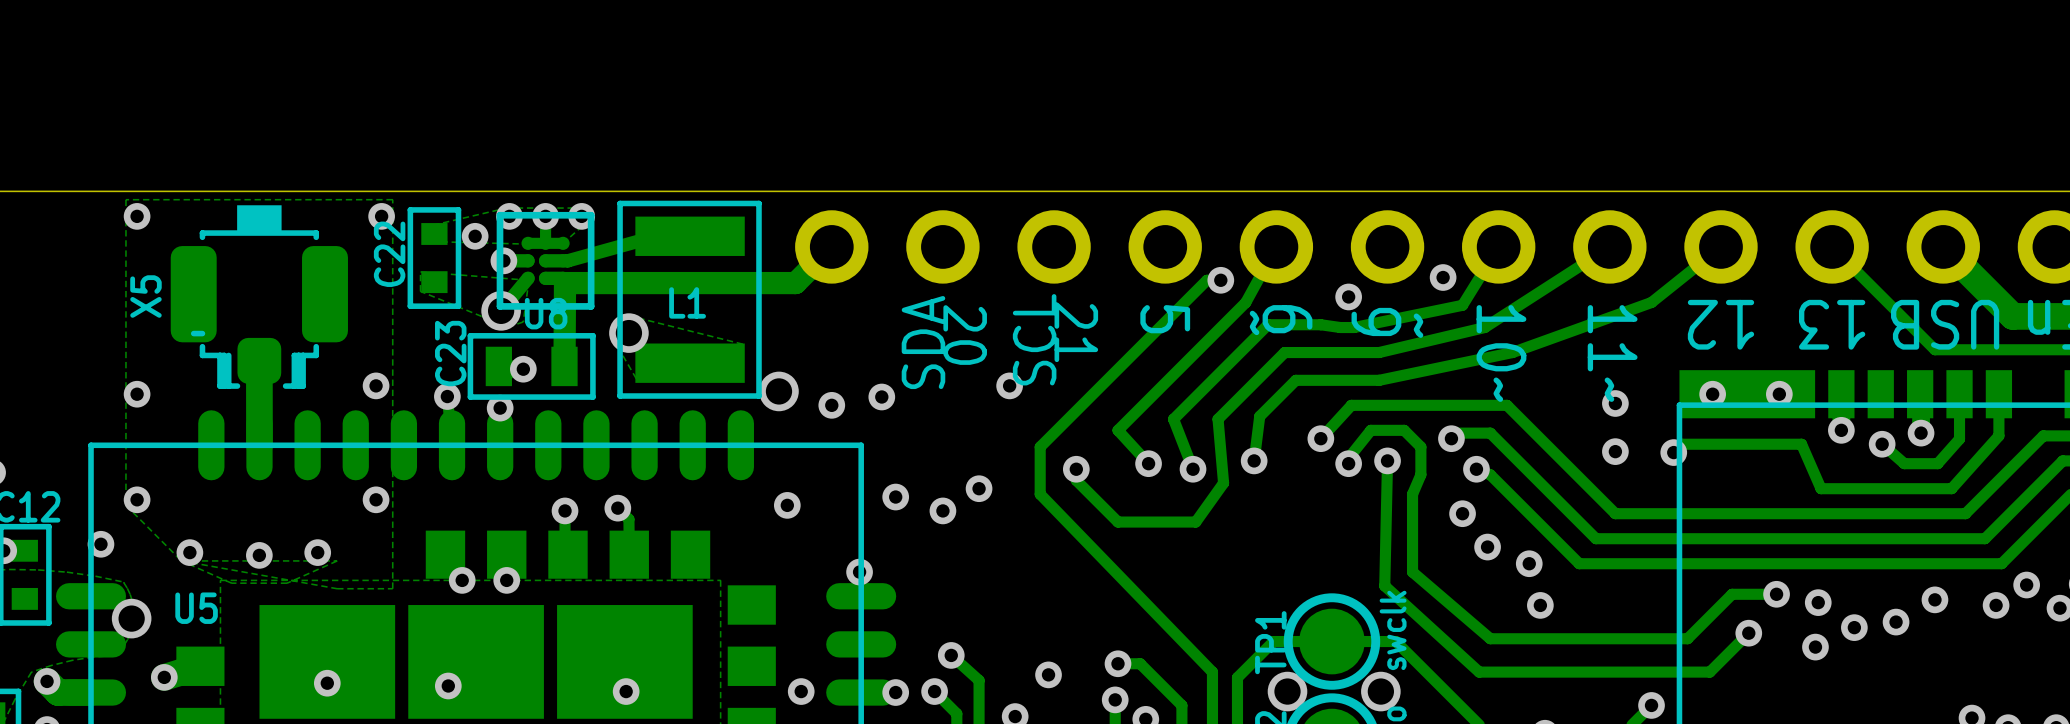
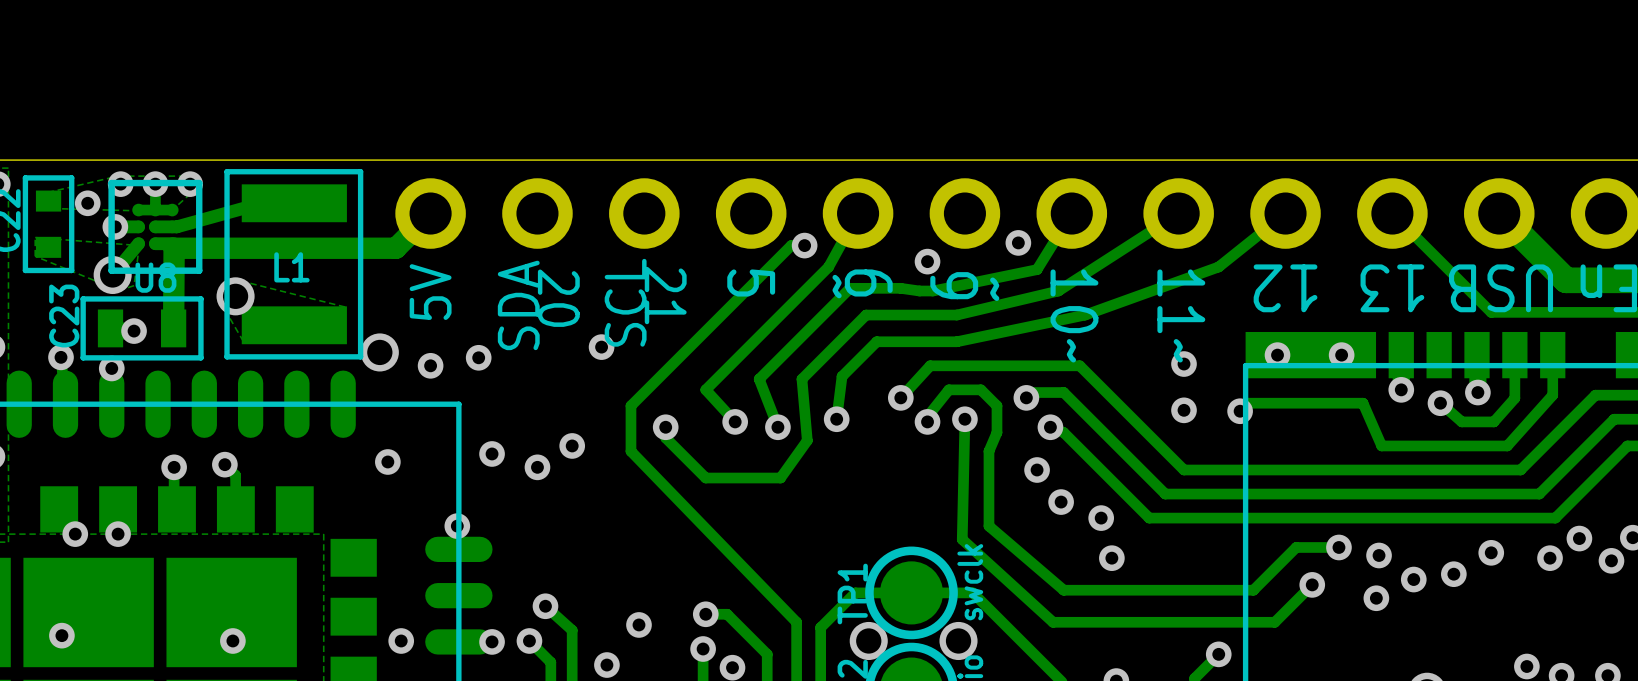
text: none -> 5V (430, 292)

